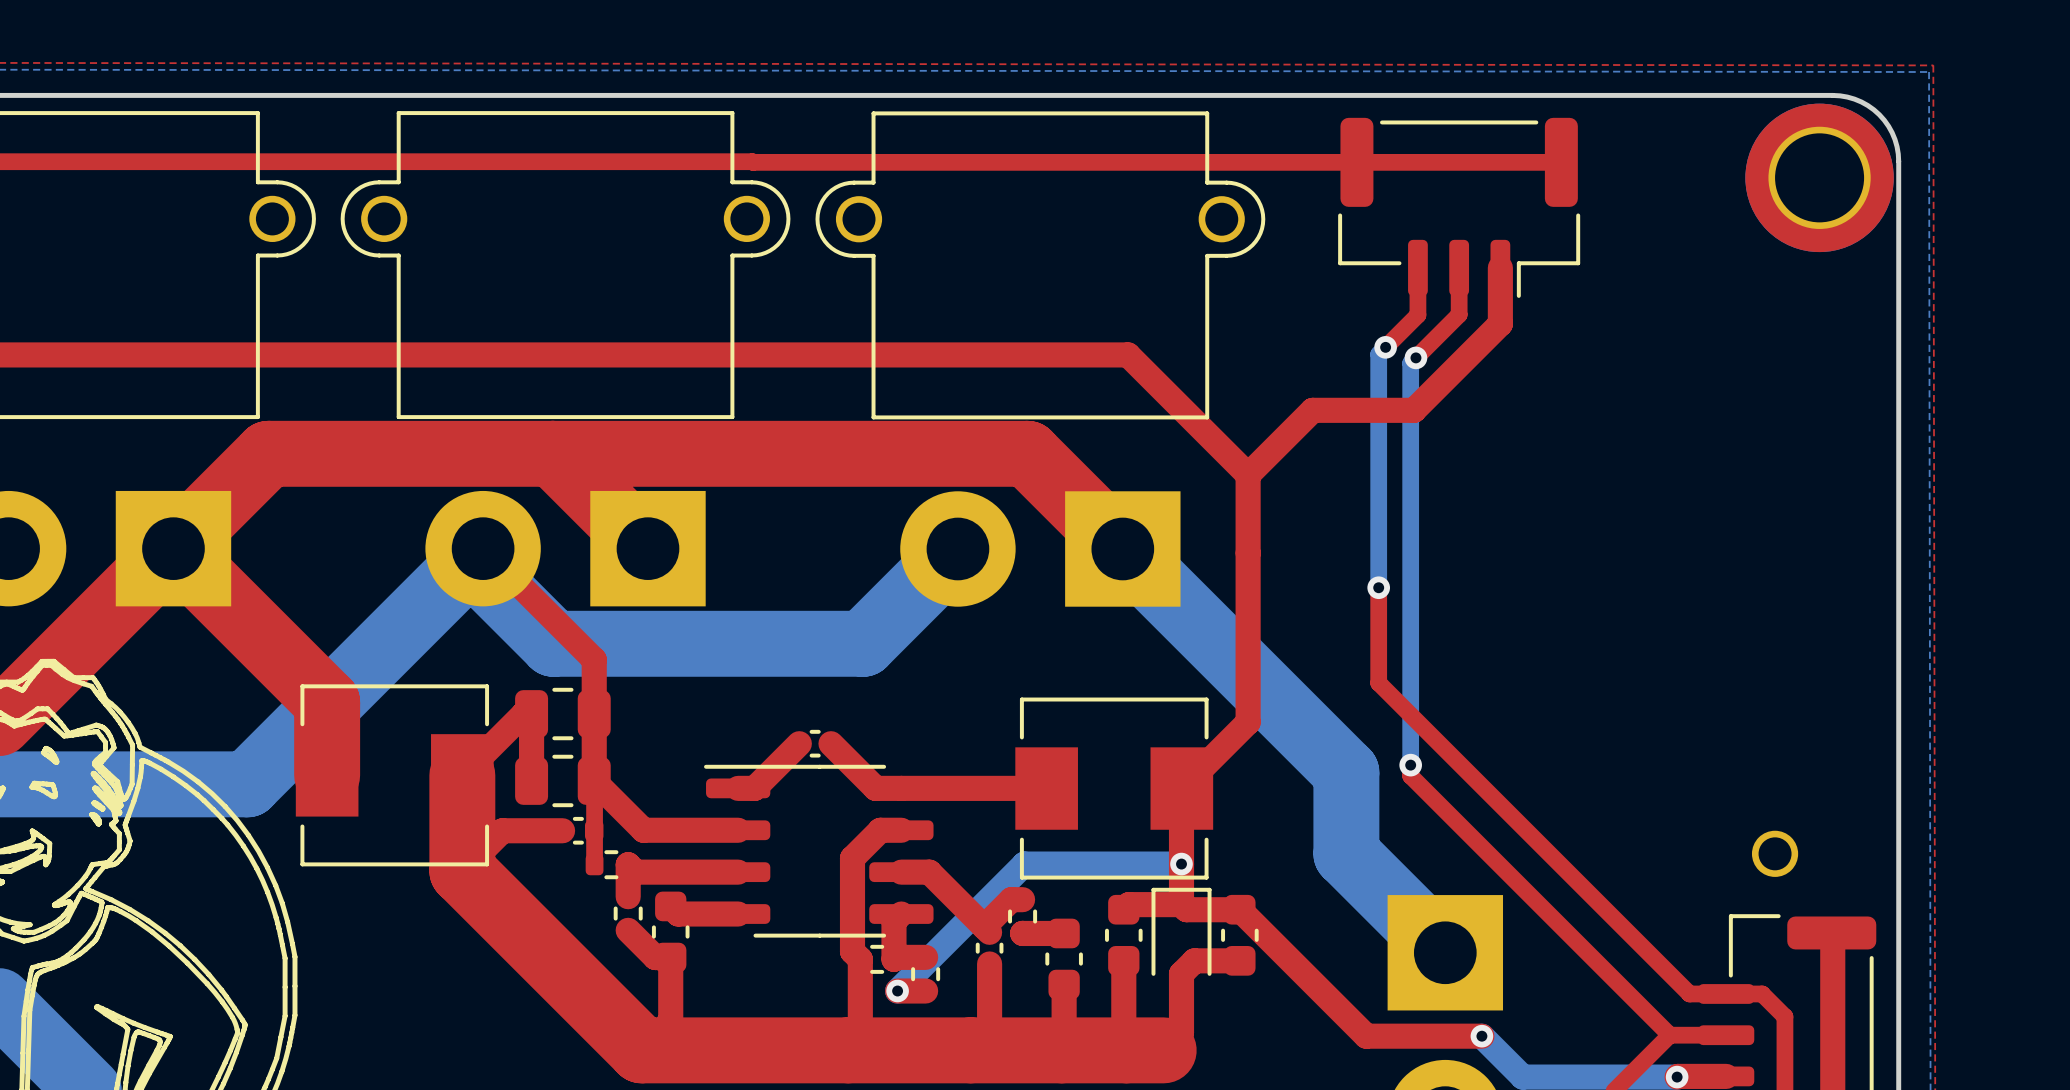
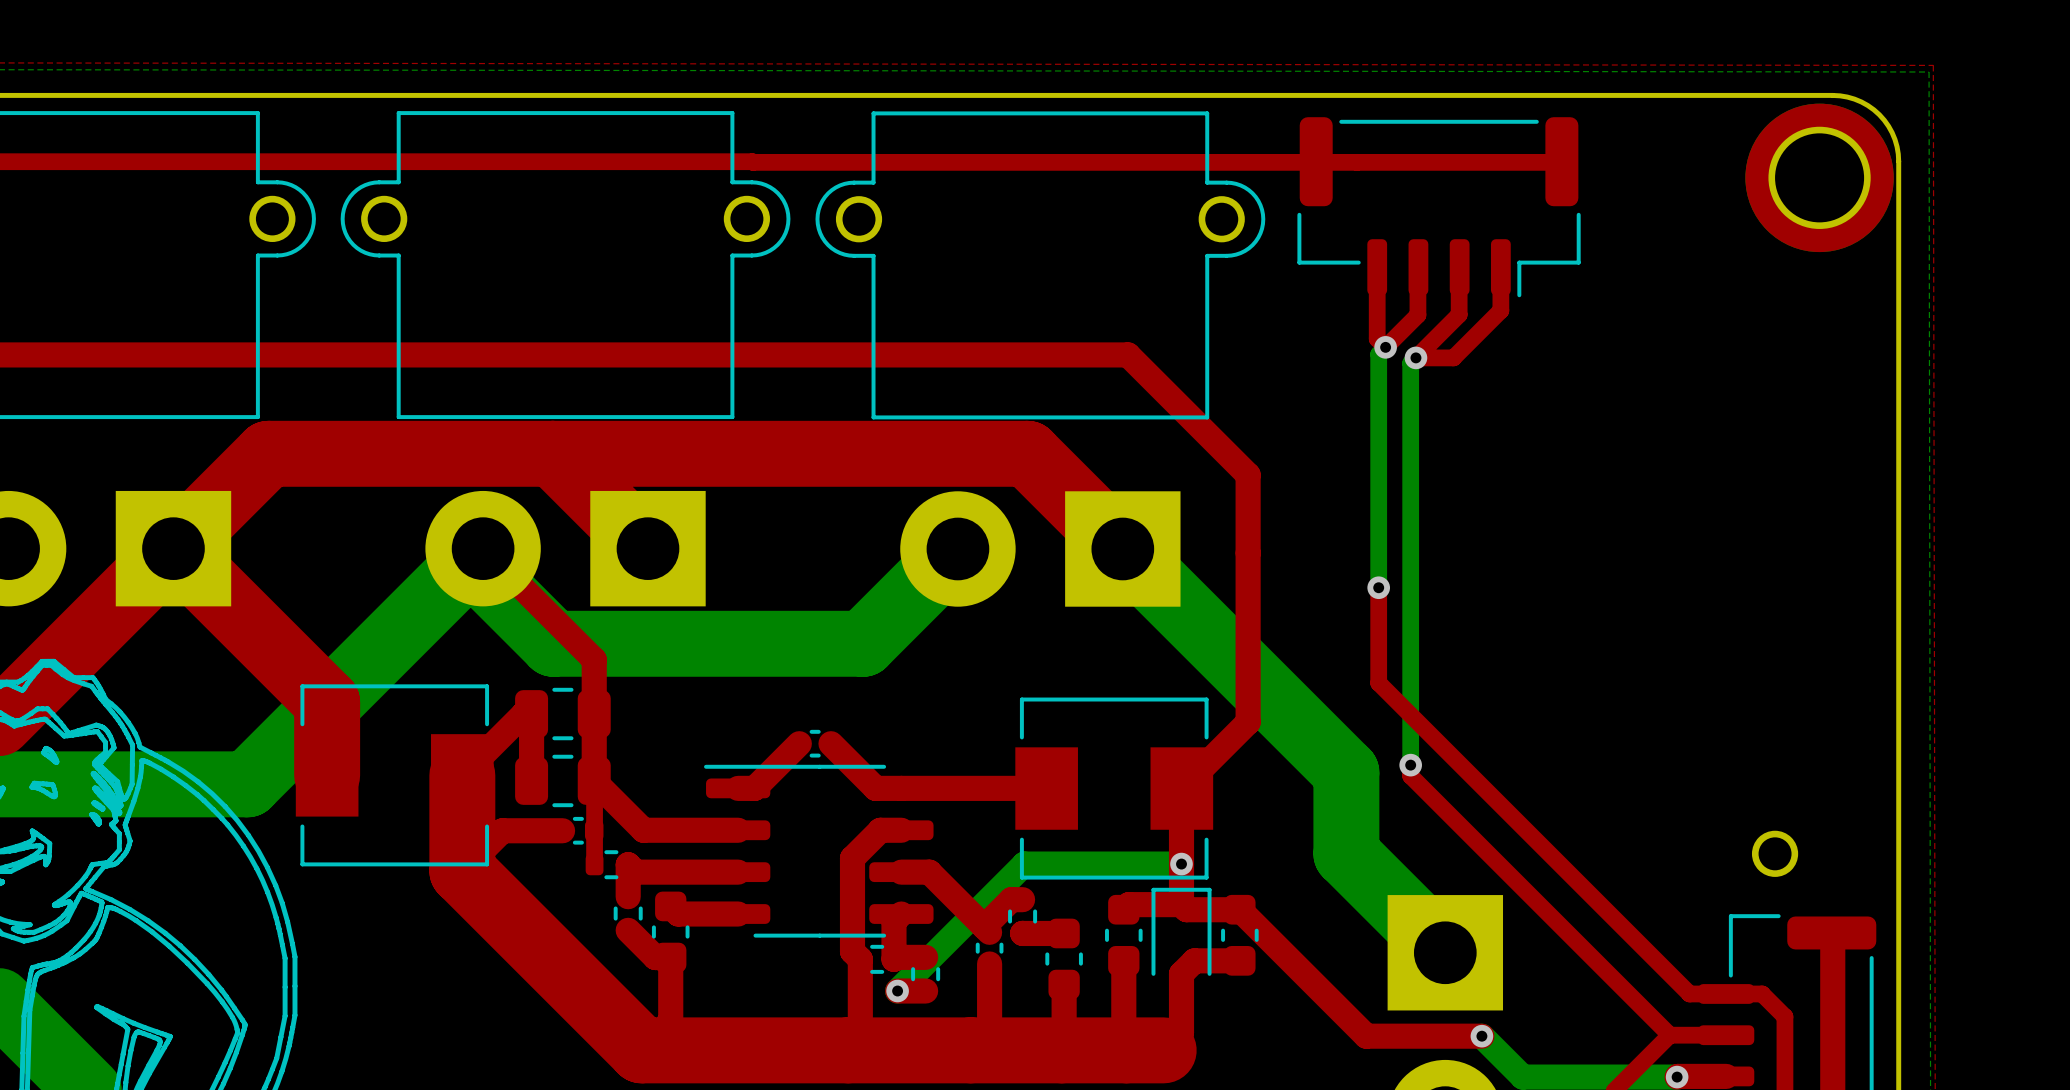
part footprint: [1338, 117, 1581, 298] -> [1297, 117, 1581, 298]
top track: none -> (1377, 267) (1377, 338) (1385, 347)
top track: (1500, 267) (1500, 323) (1413, 410) (1312, 410) (1248, 474) -> (1500, 267) (1500, 310) (1453, 357) (1415, 357)

